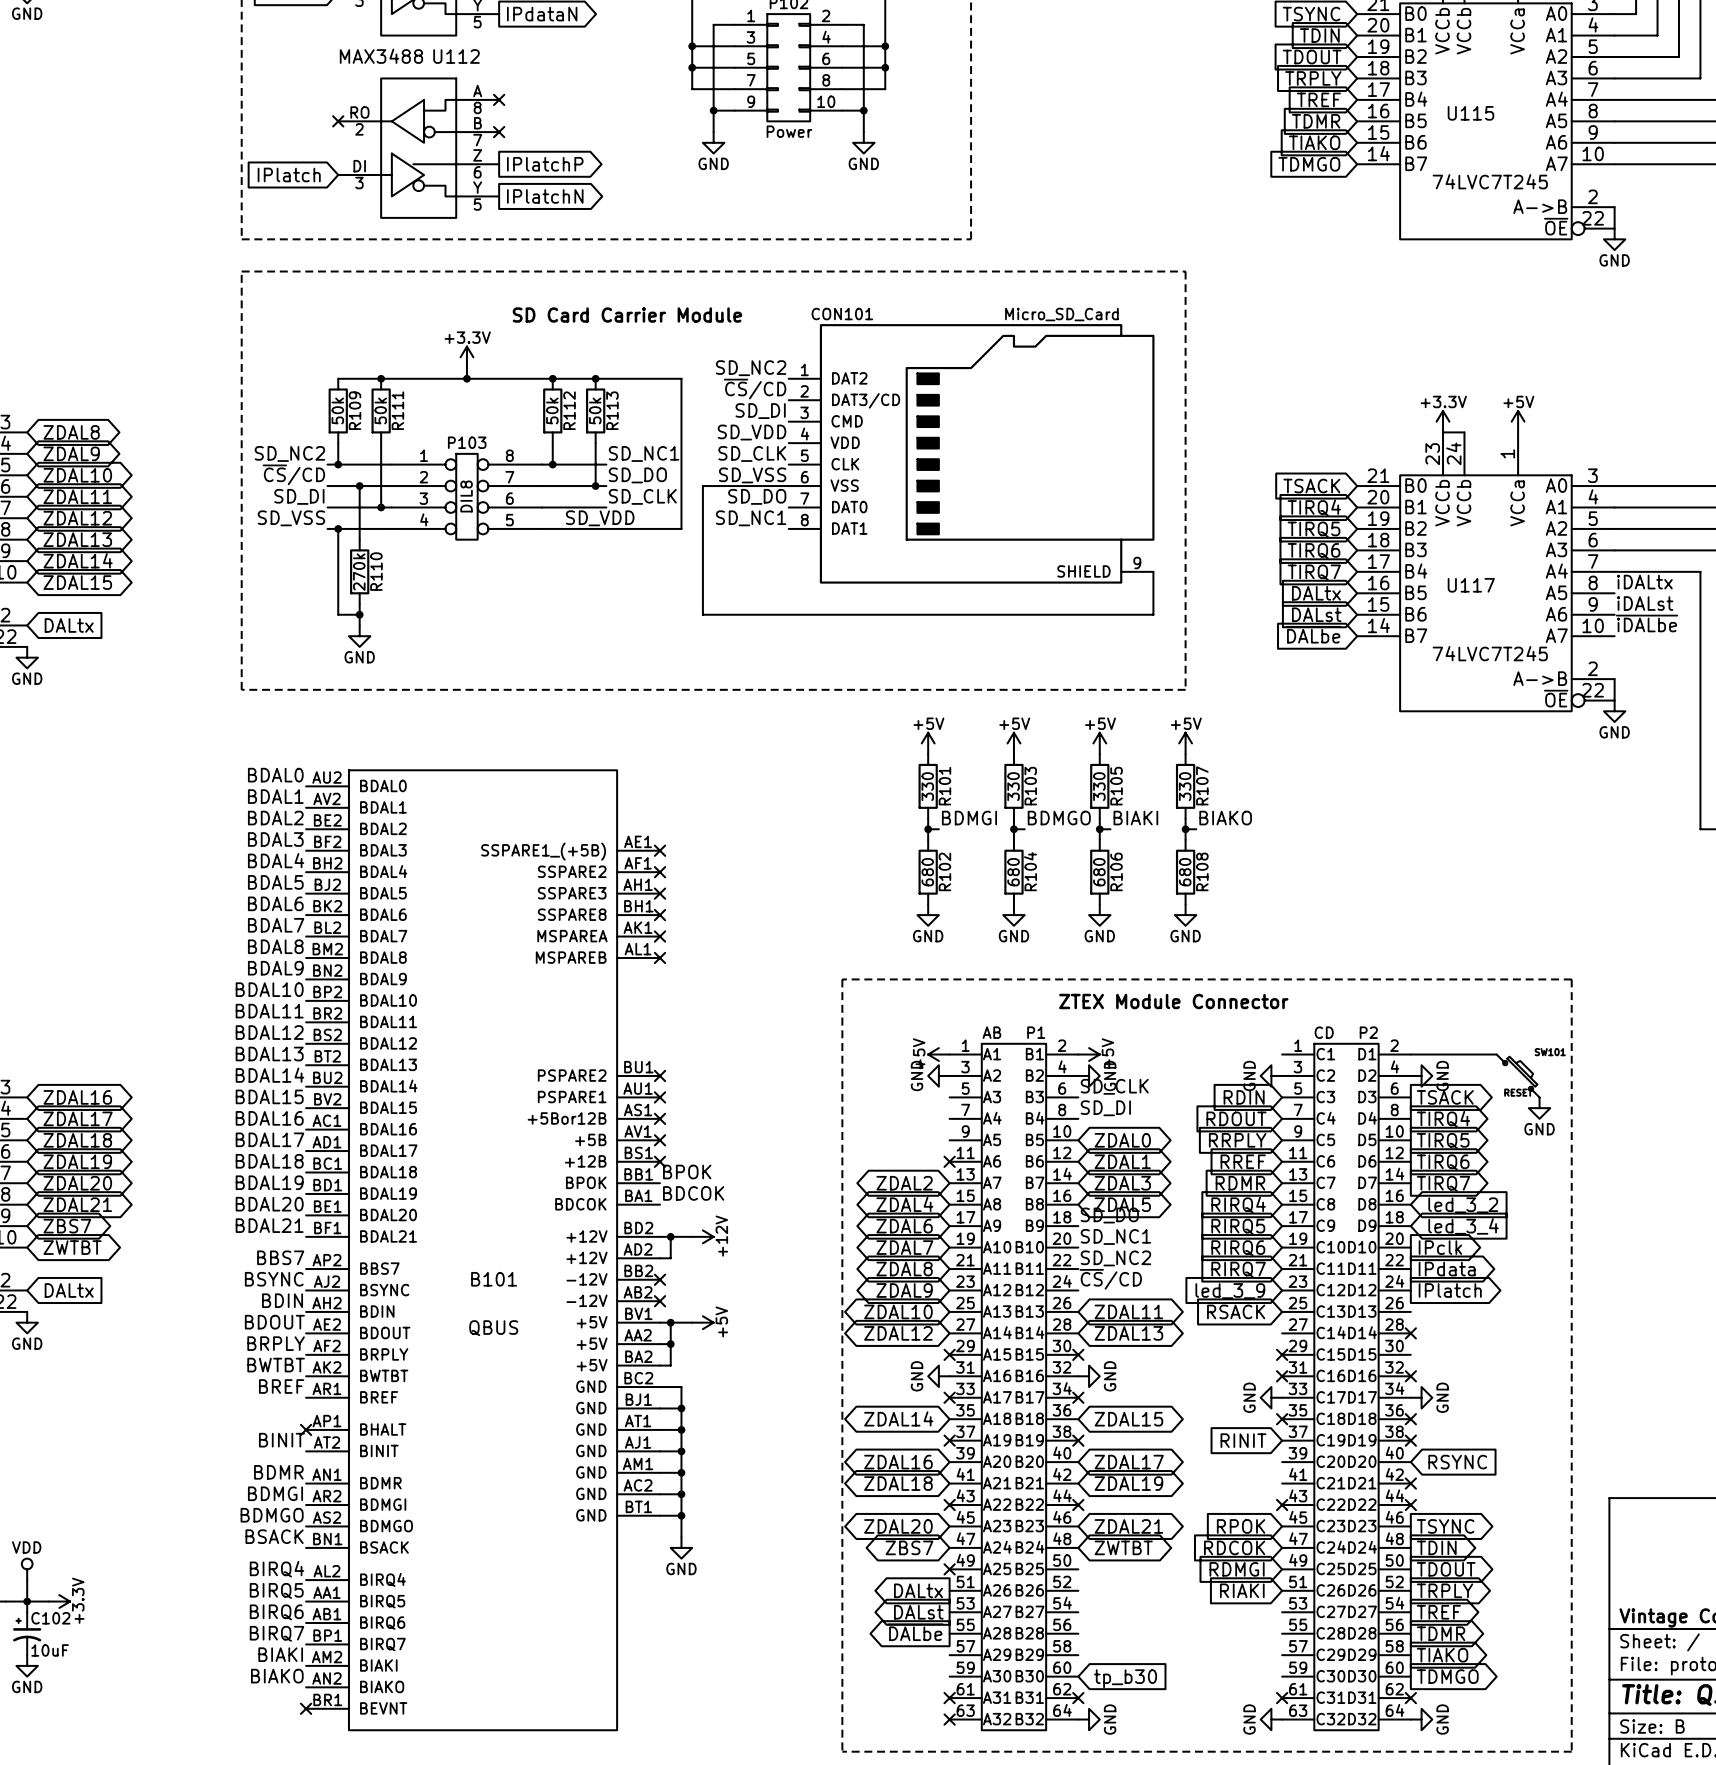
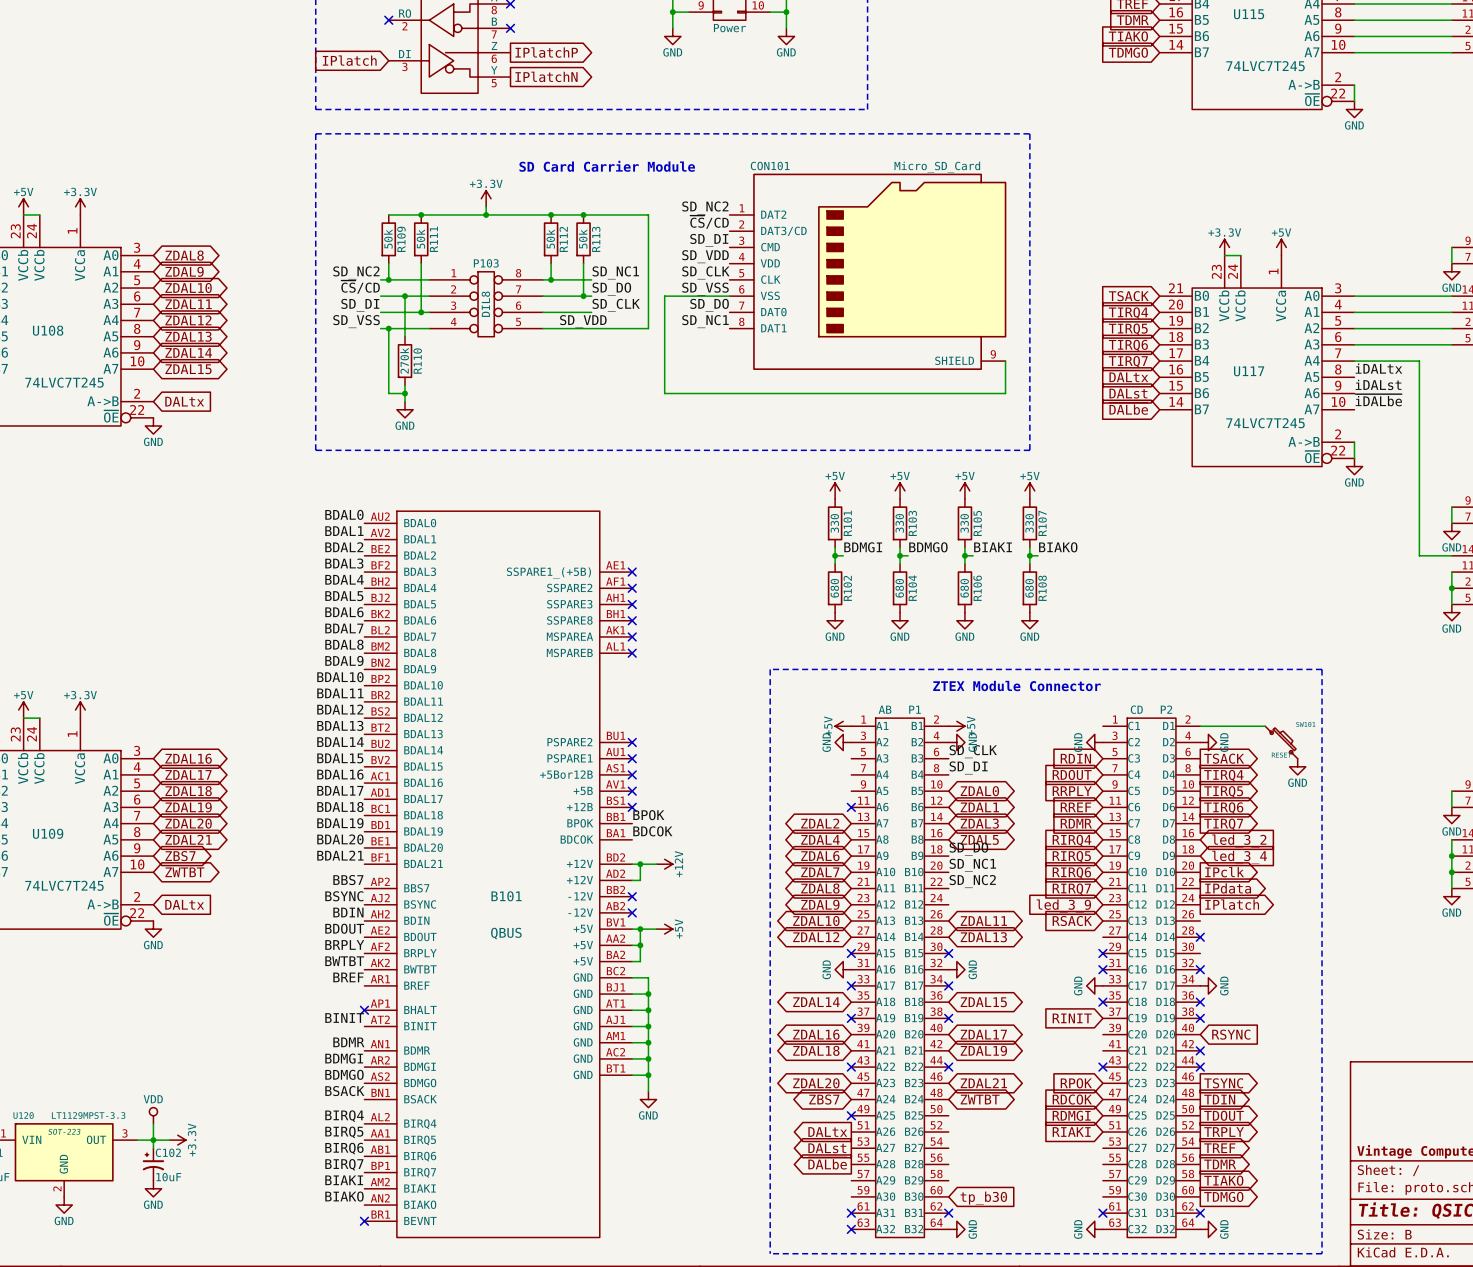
label: ~{CS}/CD (1110, 1279) -> none

